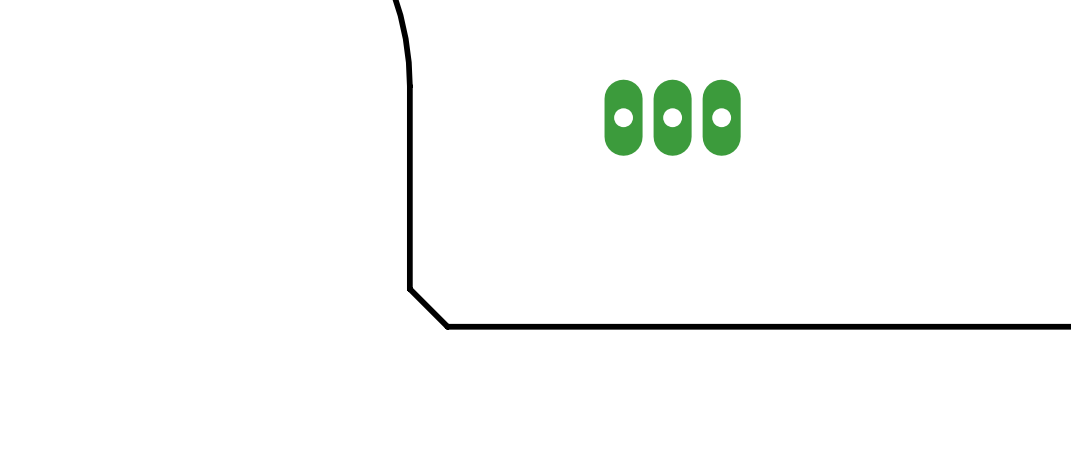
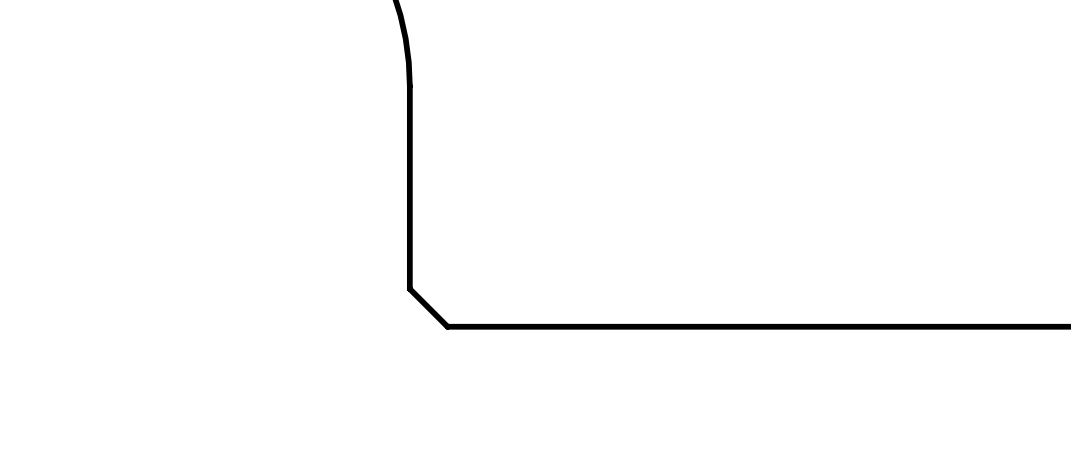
part: (672, 117) -> none

